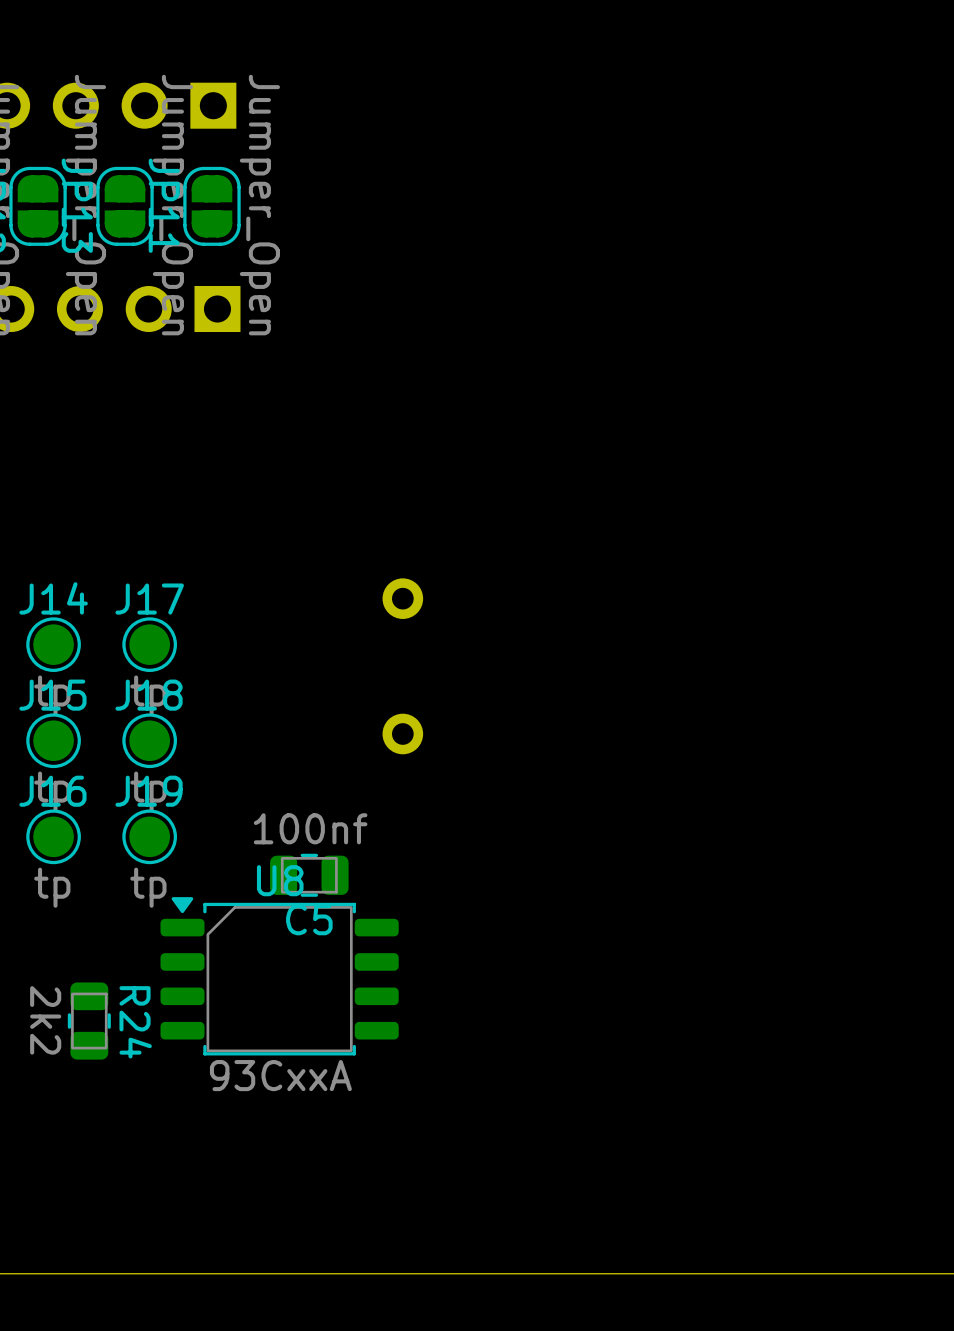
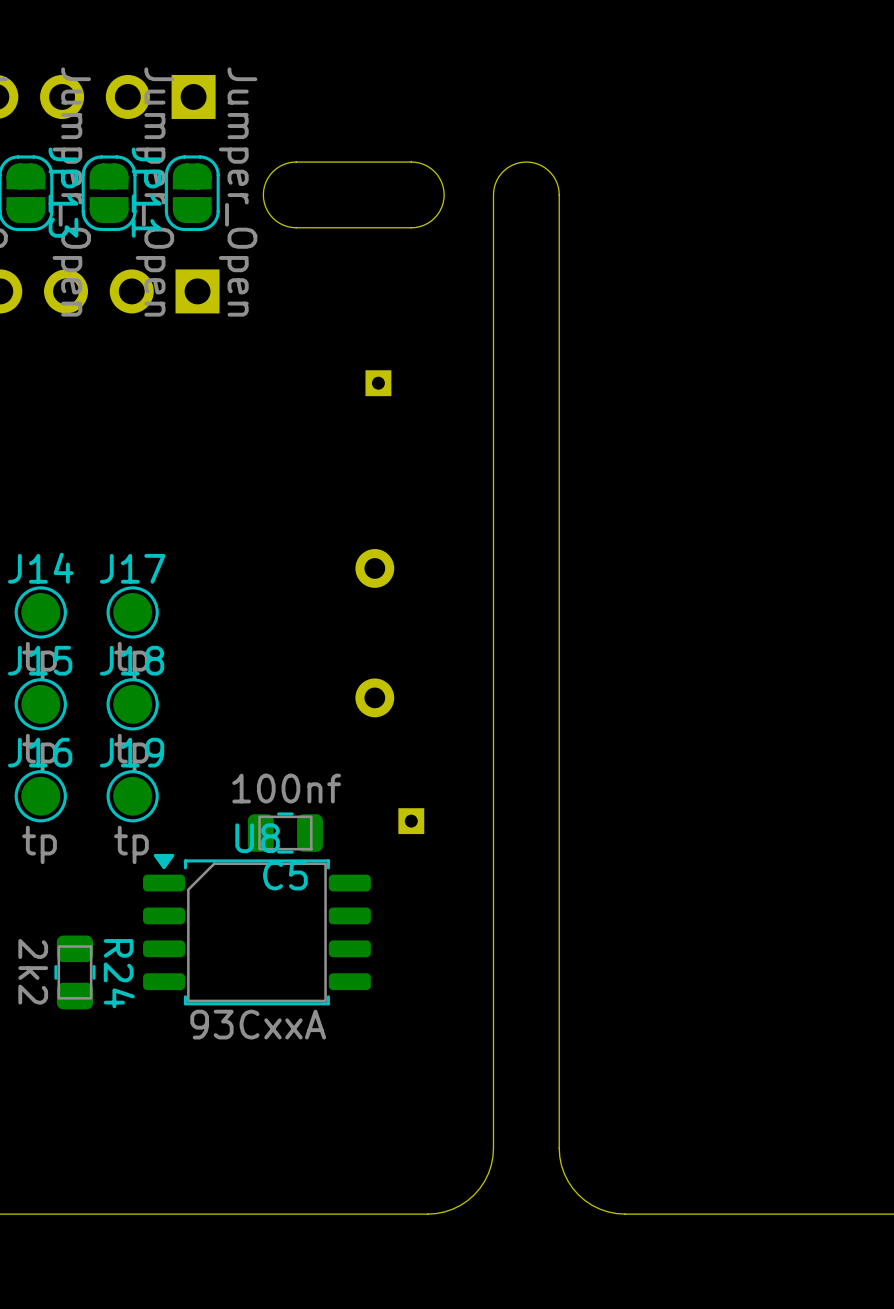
board edge: none -> (411, 162) (287, 163) (276, 168) (267, 178) (263, 190) (264, 203) (267, 211) (276, 220) (291, 227) (419, 226) (431, 220) (439, 211) (443, 199) (443, 190) (439, 178) (434, 171) (423, 164) (411, 162)
part: none -> (378, 383)
part: none -> (411, 821)
board edge: (664, 1273) (458, 1273) -> (625, 1214) (599, 1209) (578, 1194) (568, 1181) (559, 1156) (559, 194) (557, 183) (548, 170) (538, 164) (526, 162) (511, 165) (501, 173) (495, 183) (493, 194) (492, 1156) (484, 1181) (467, 1200) (452, 1209) (427, 1214)

